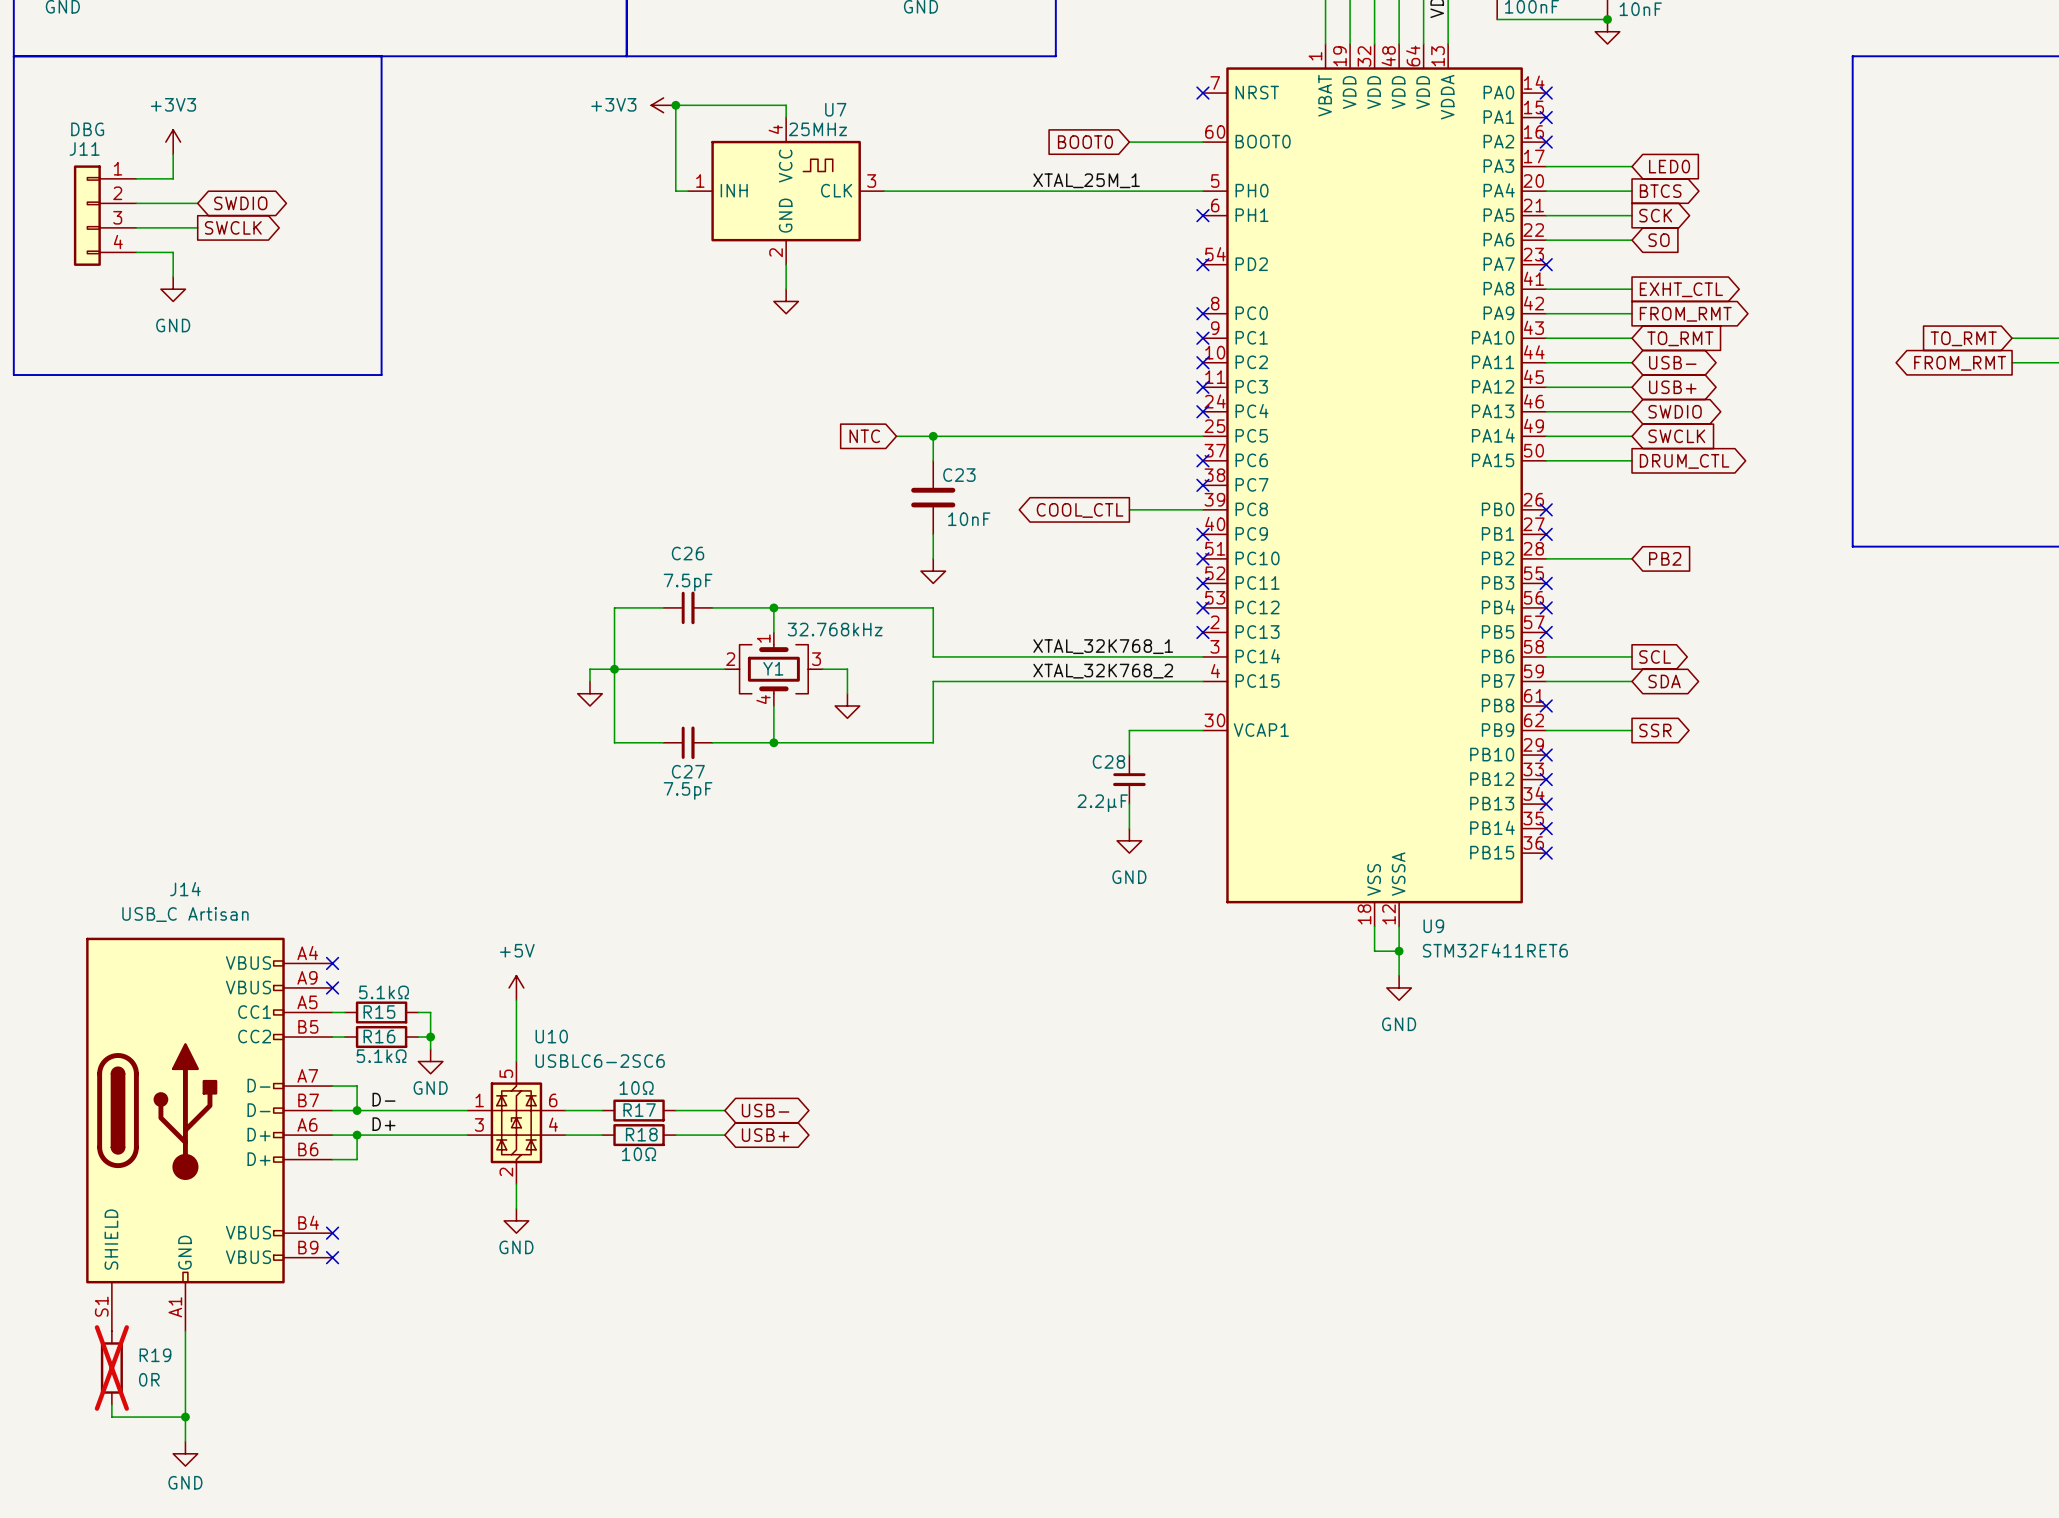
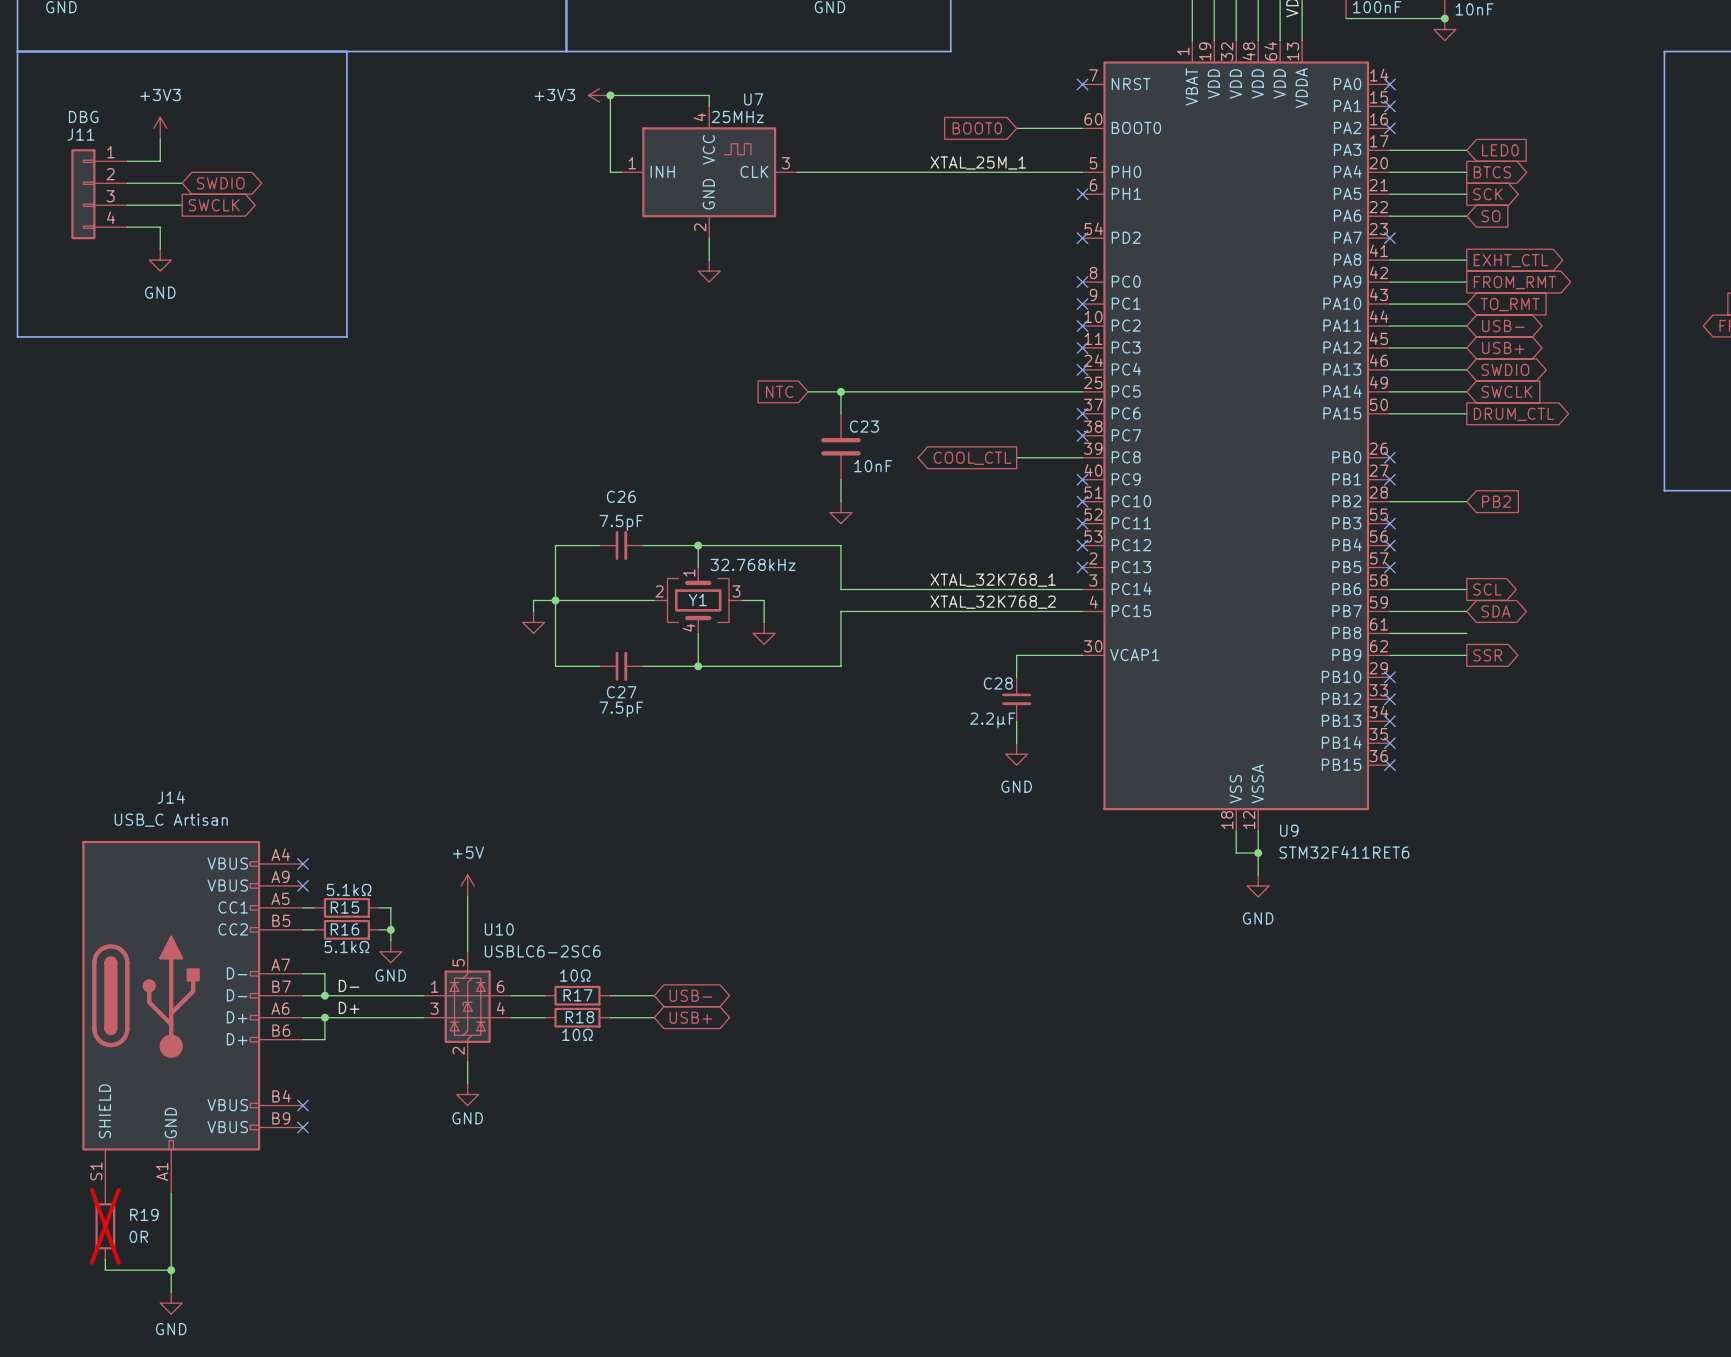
wire: none -> (1389, 633) (1466, 633)
no-connect mark: (1546, 706) -> none

